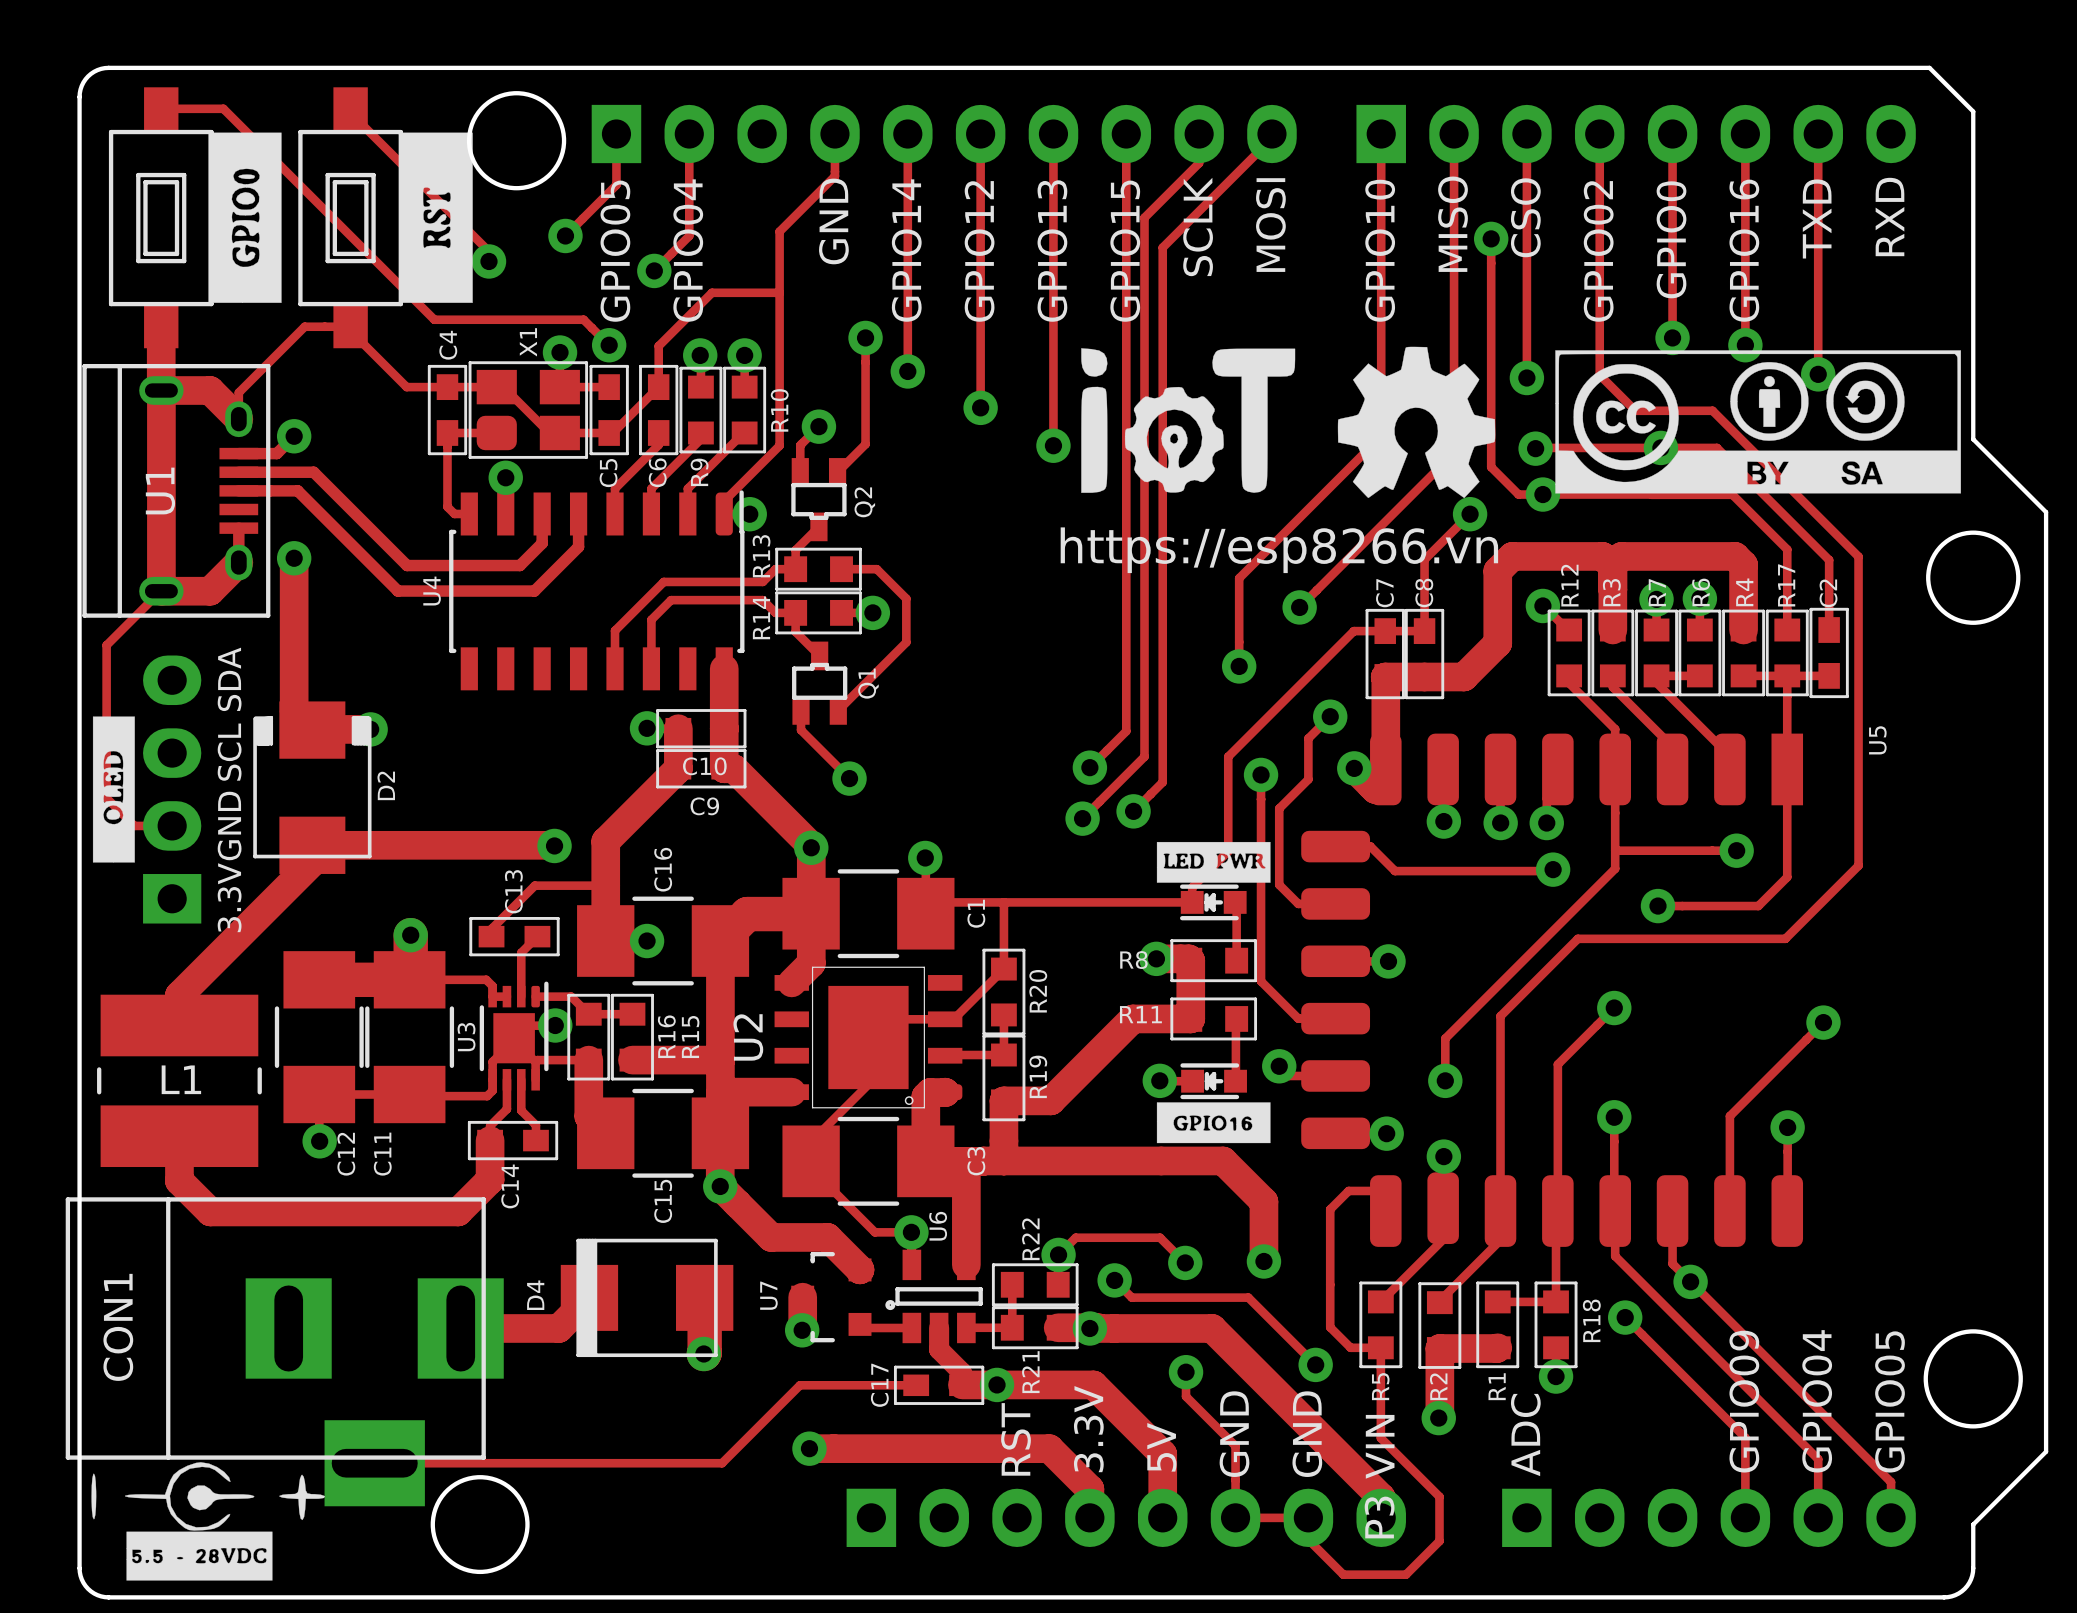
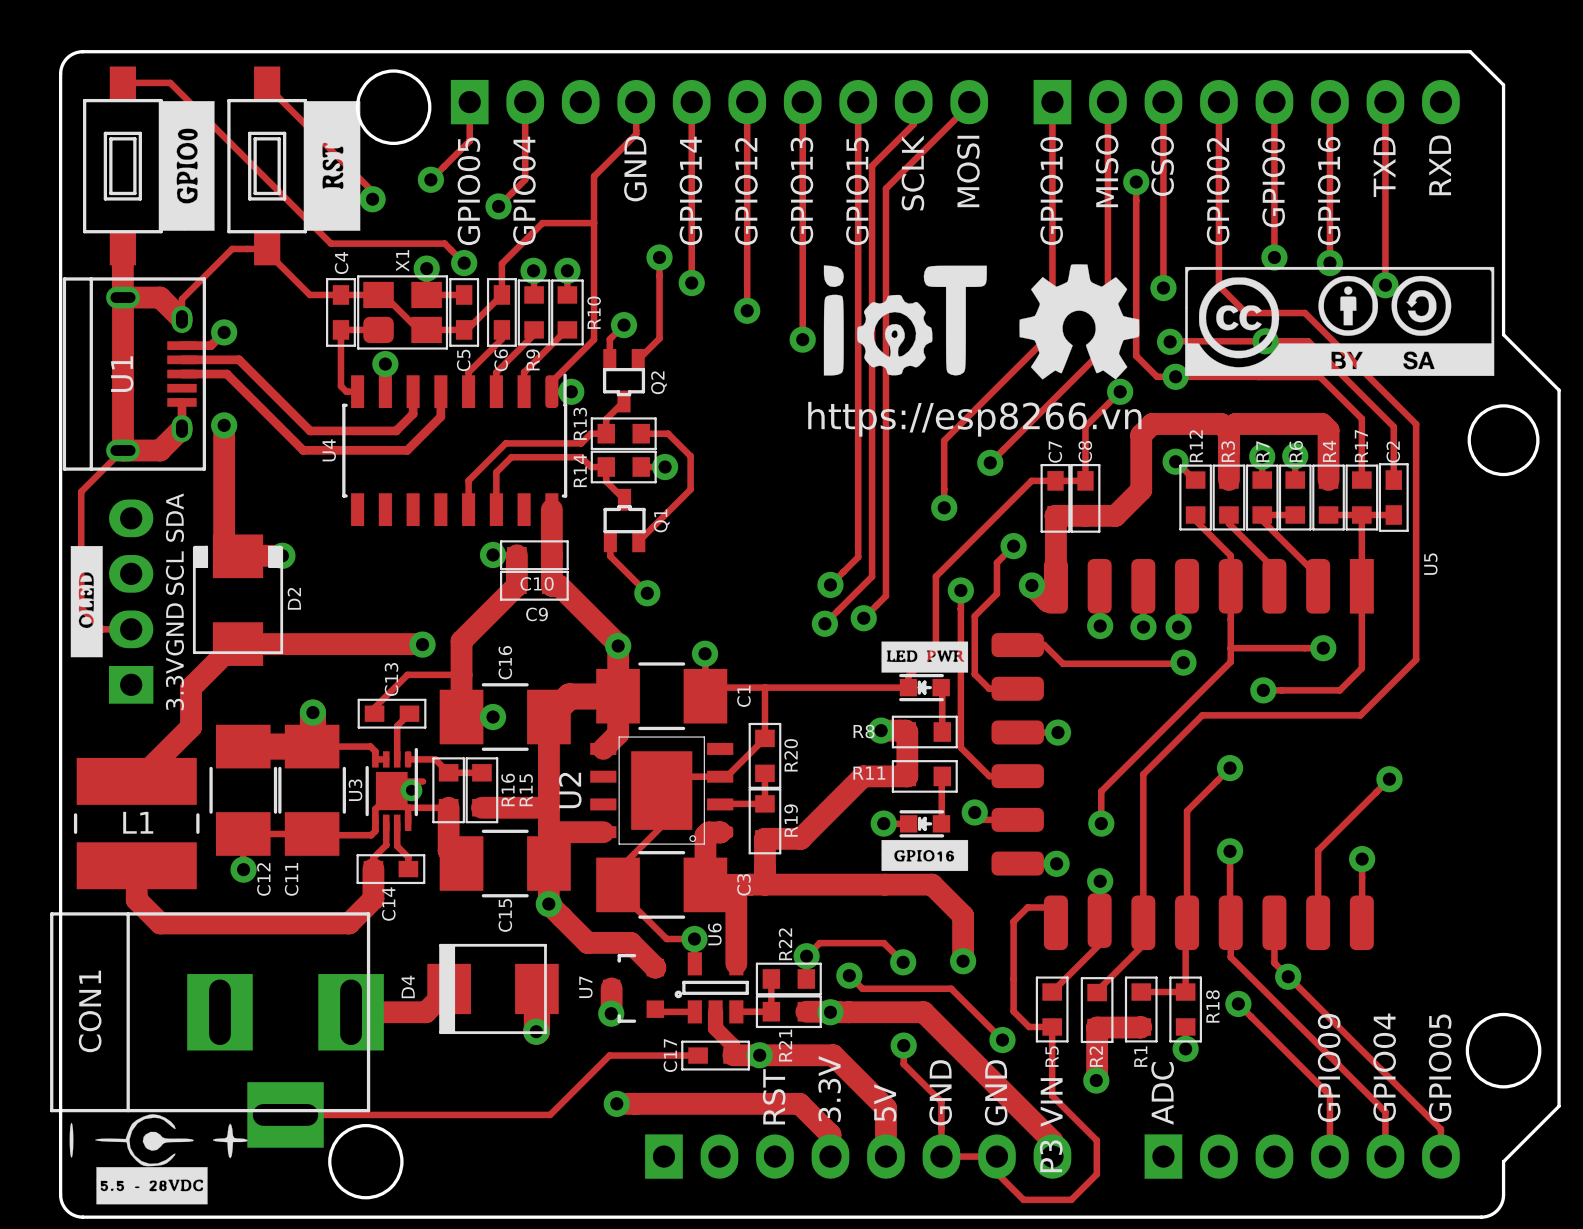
track: (312, 845) (312, 862) (179, 995) (179, 1025) -> (238, 644) (234, 644) (191, 687) (191, 727) (136, 781)
via position: (555, 1025) -> (411, 790)

